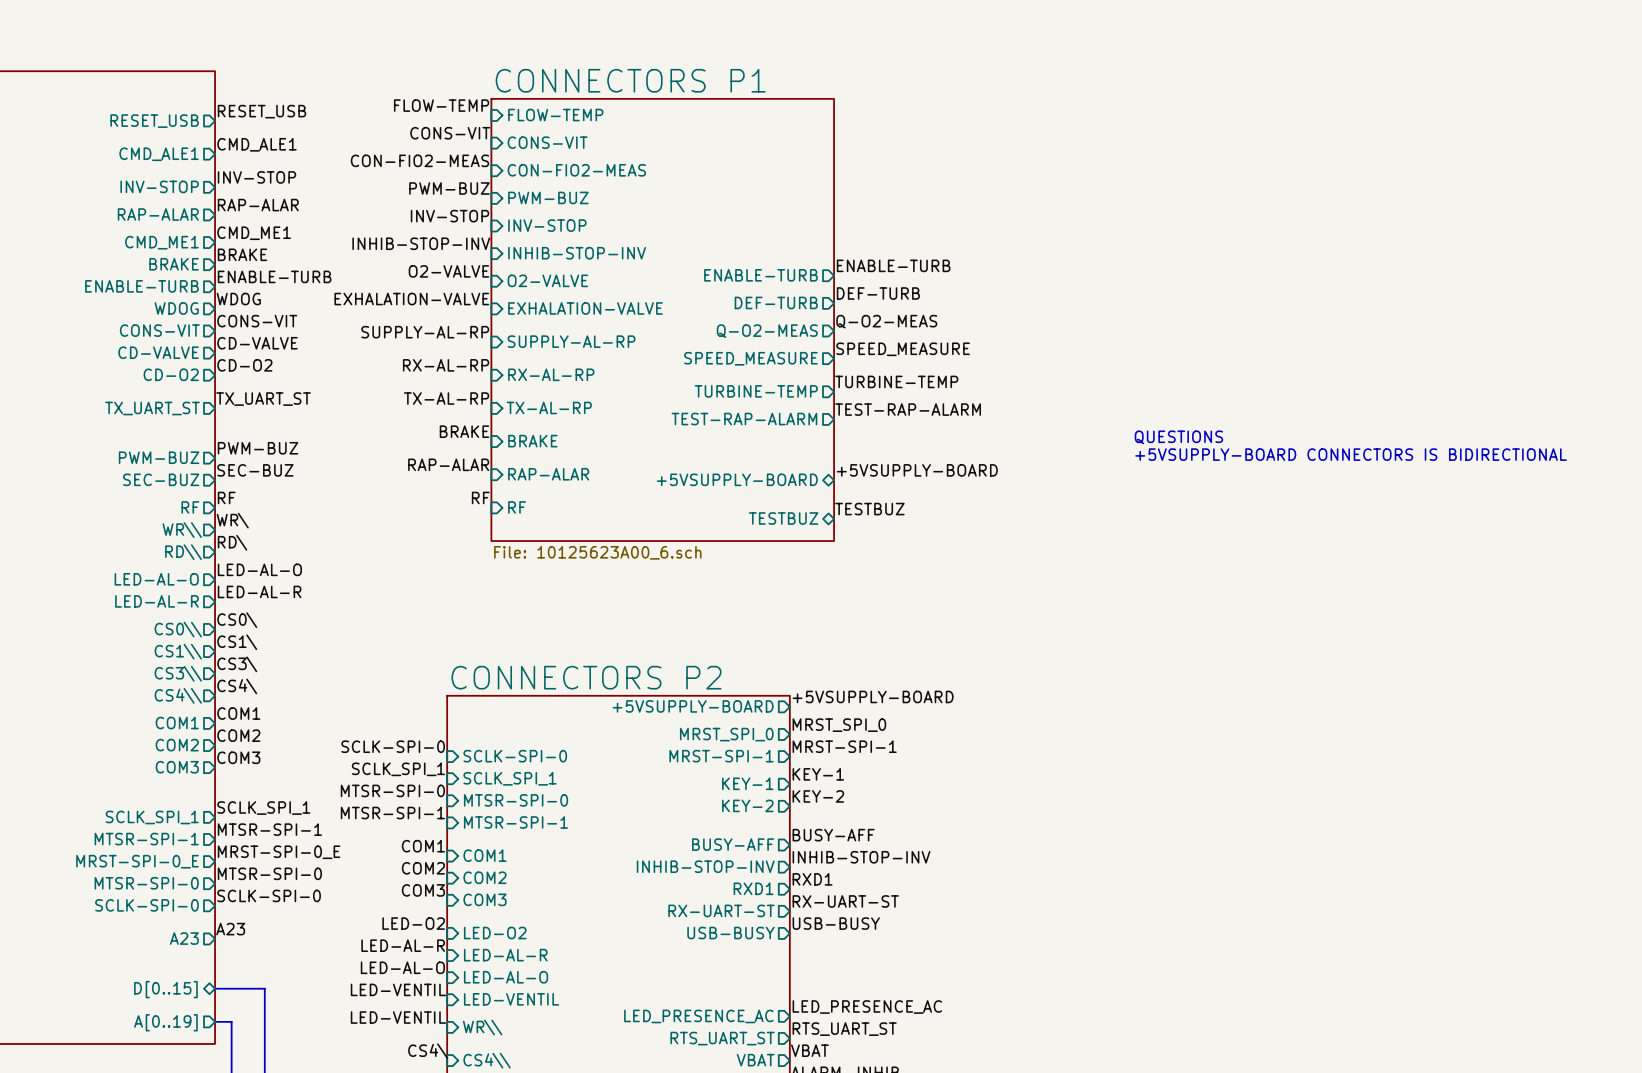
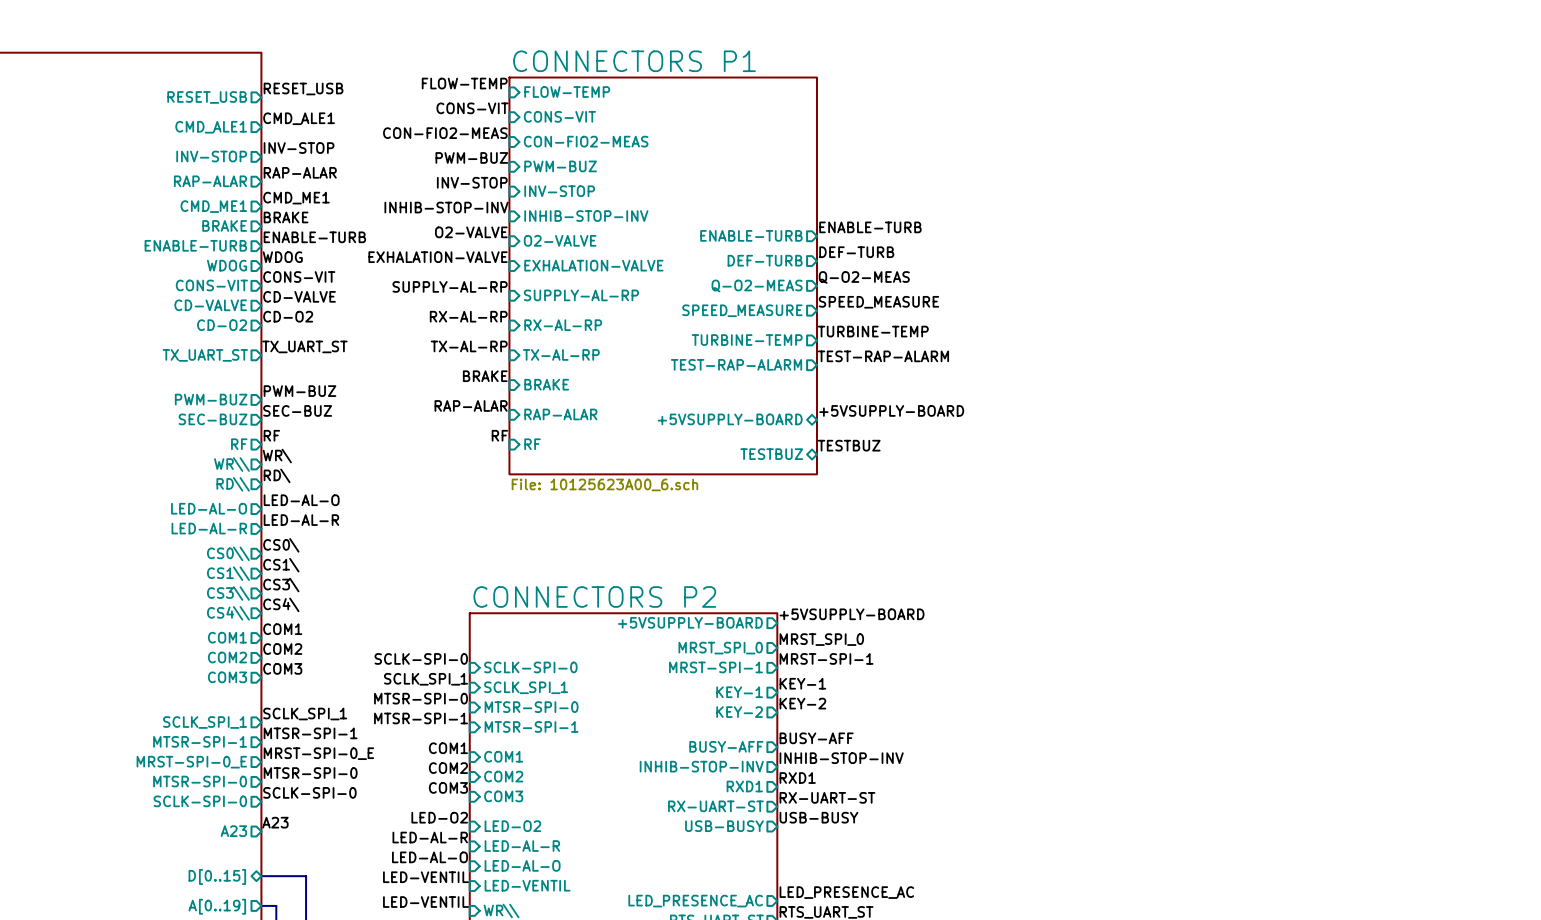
text: QUESTIONS (1178, 437) -> none
text: +5VSUPPLY-BOARD CONNECTORS IS BIDIRECTIONAL (1351, 454) -> none

